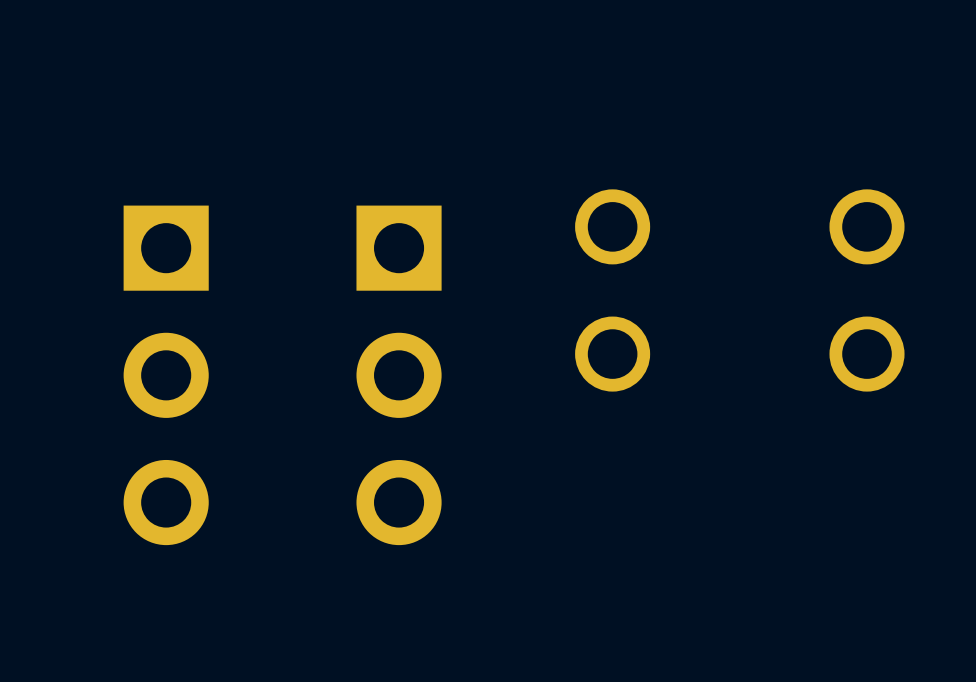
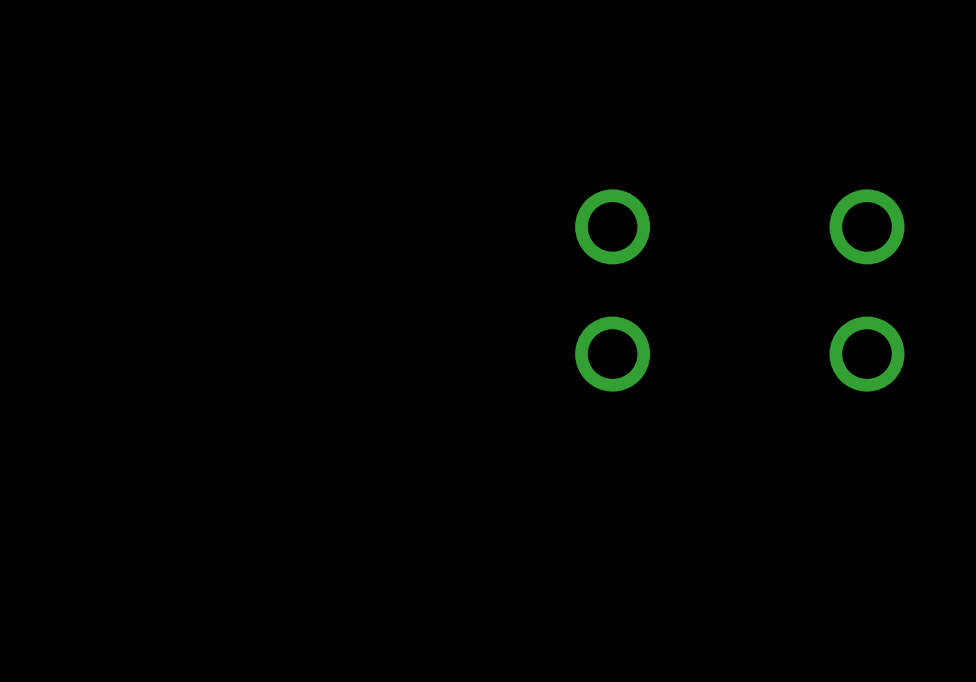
part: (166, 375) -> none
part: (399, 375) -> none

